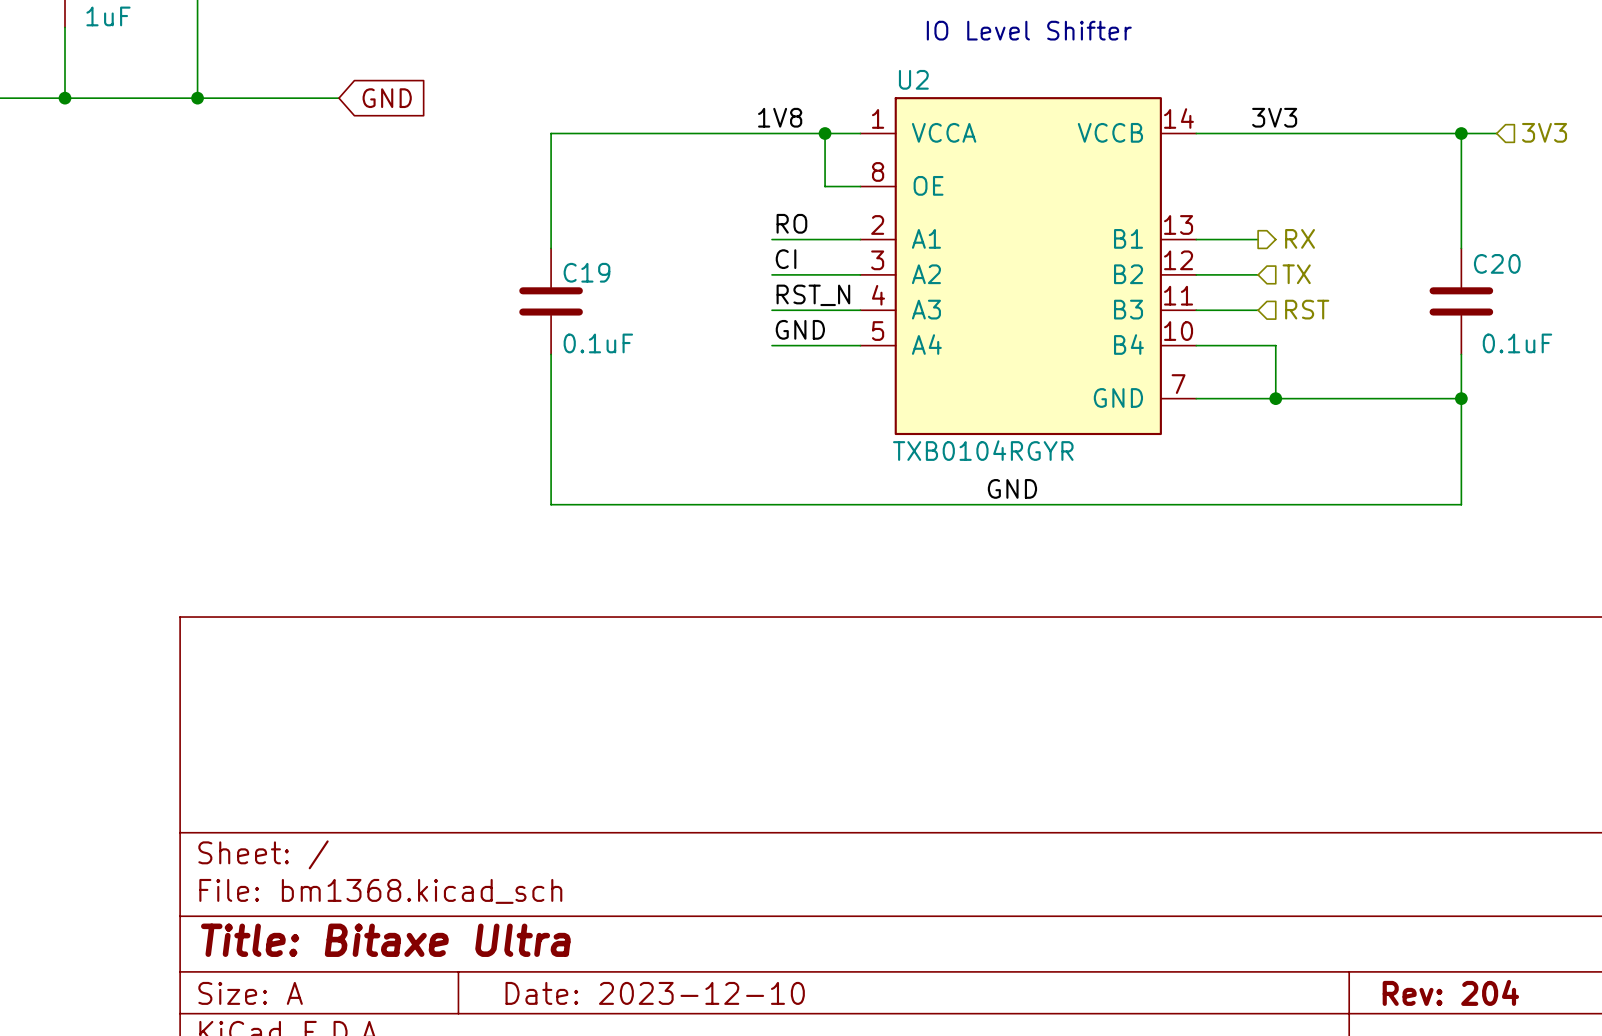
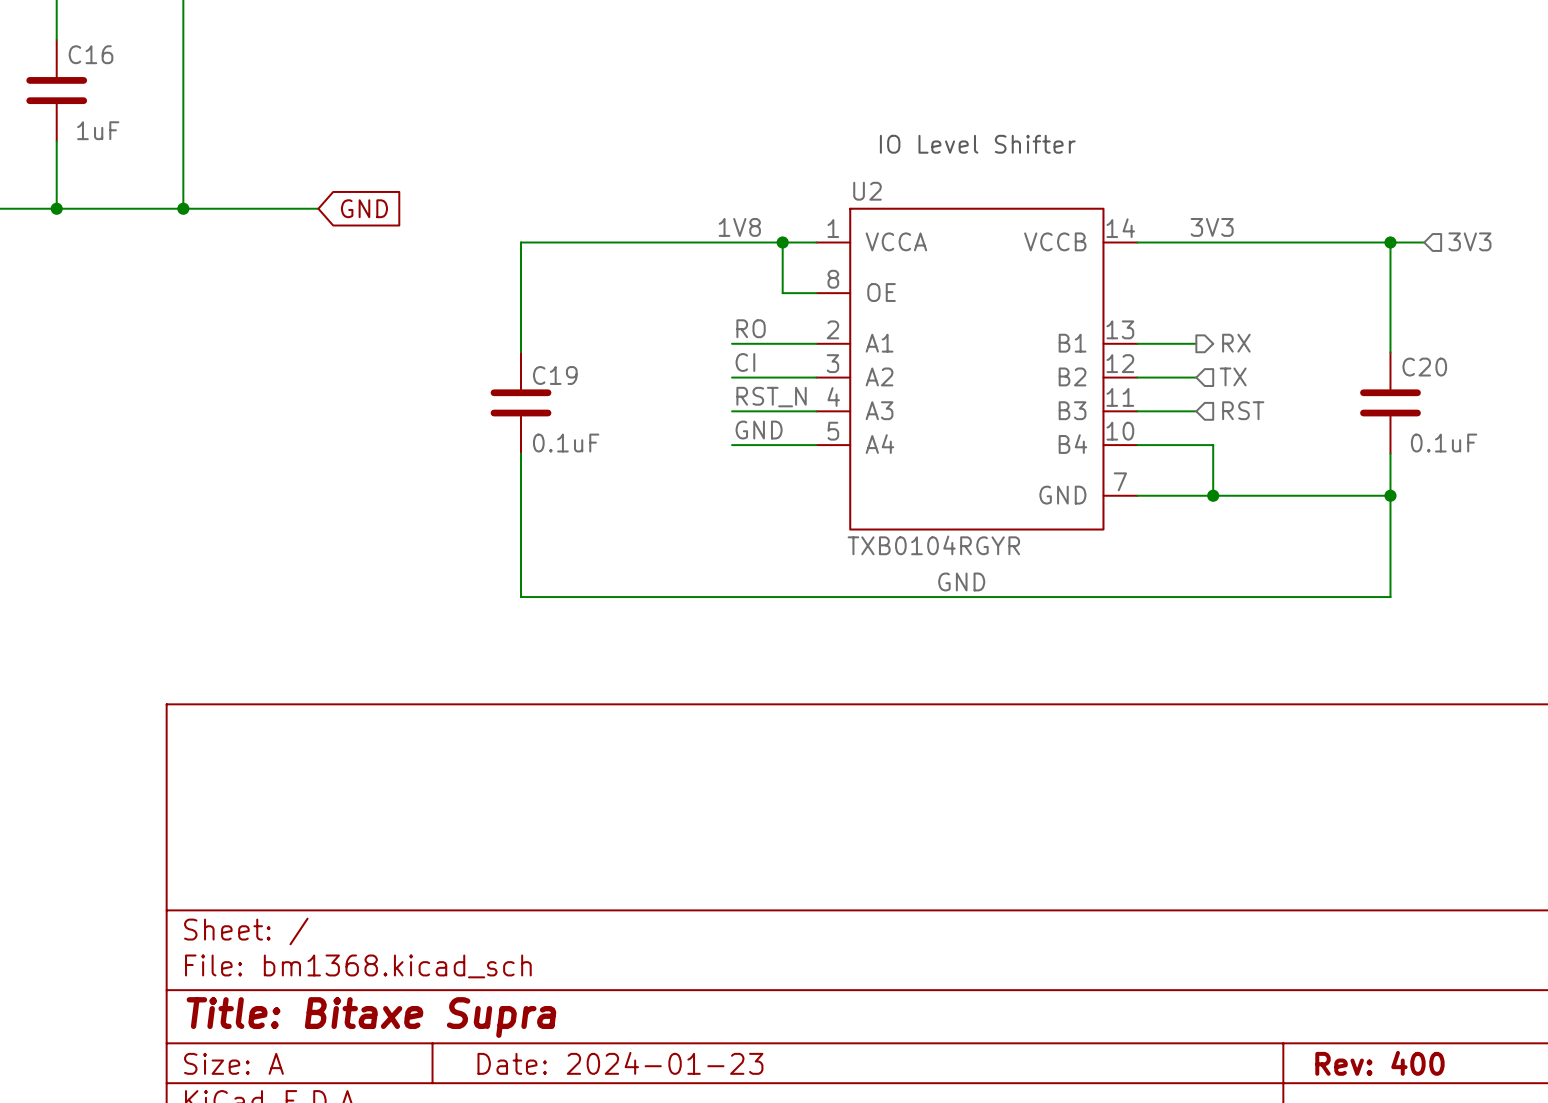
title block: Title: Bitaxe Ultra (385, 940) -> Title: Bitaxe Supra (371, 1017)
title block: Rev: 204 (1450, 992) -> Rev: 400 (1379, 1063)
title block: Date: 2023-12-10 (655, 993) -> Date: 2024-01-23 (620, 1063)

